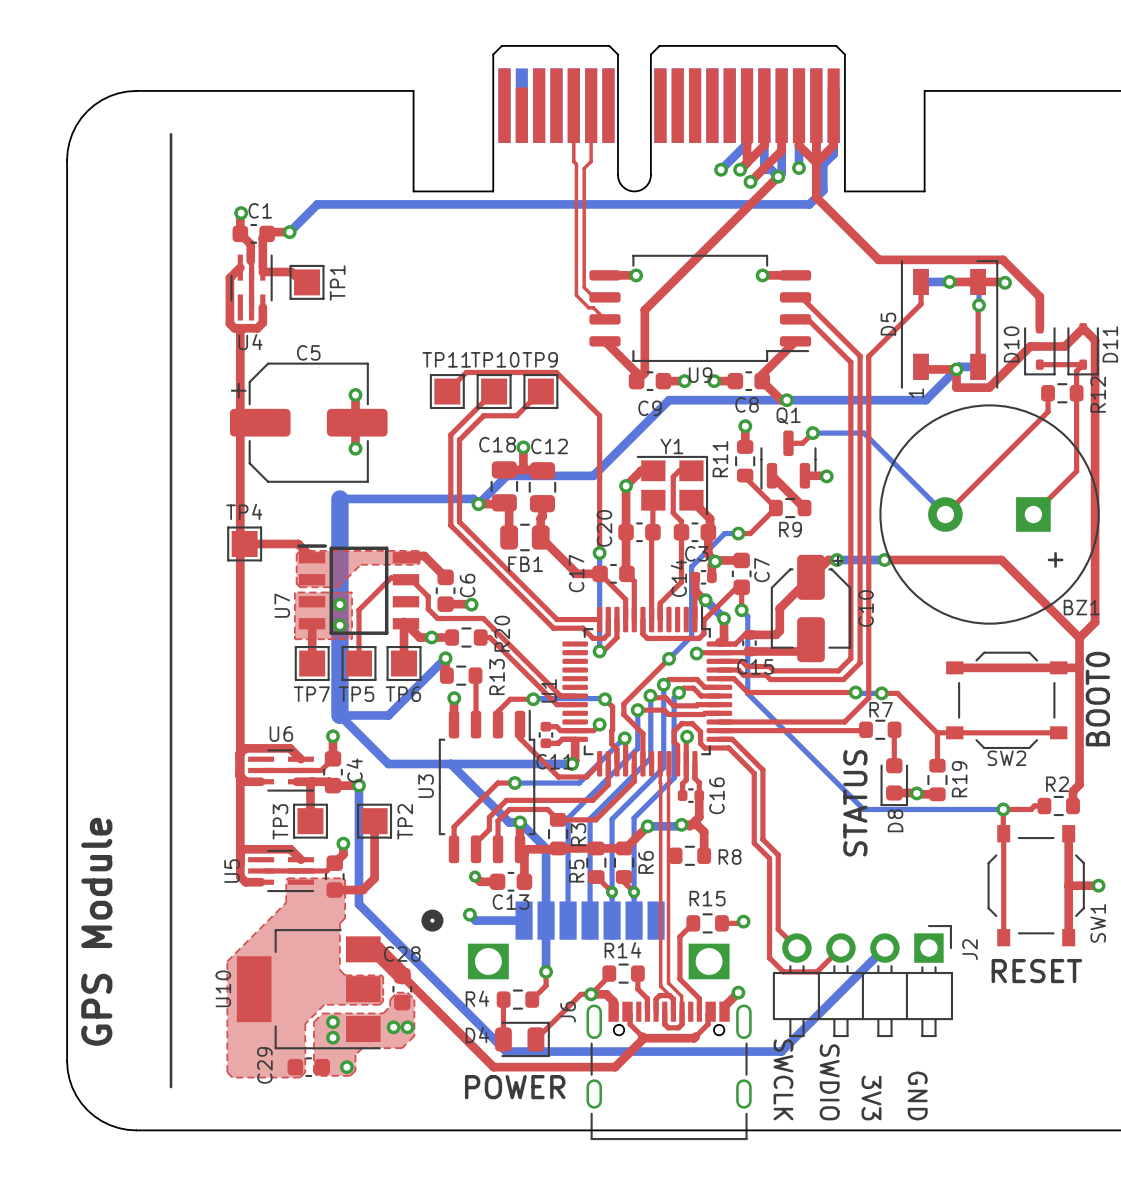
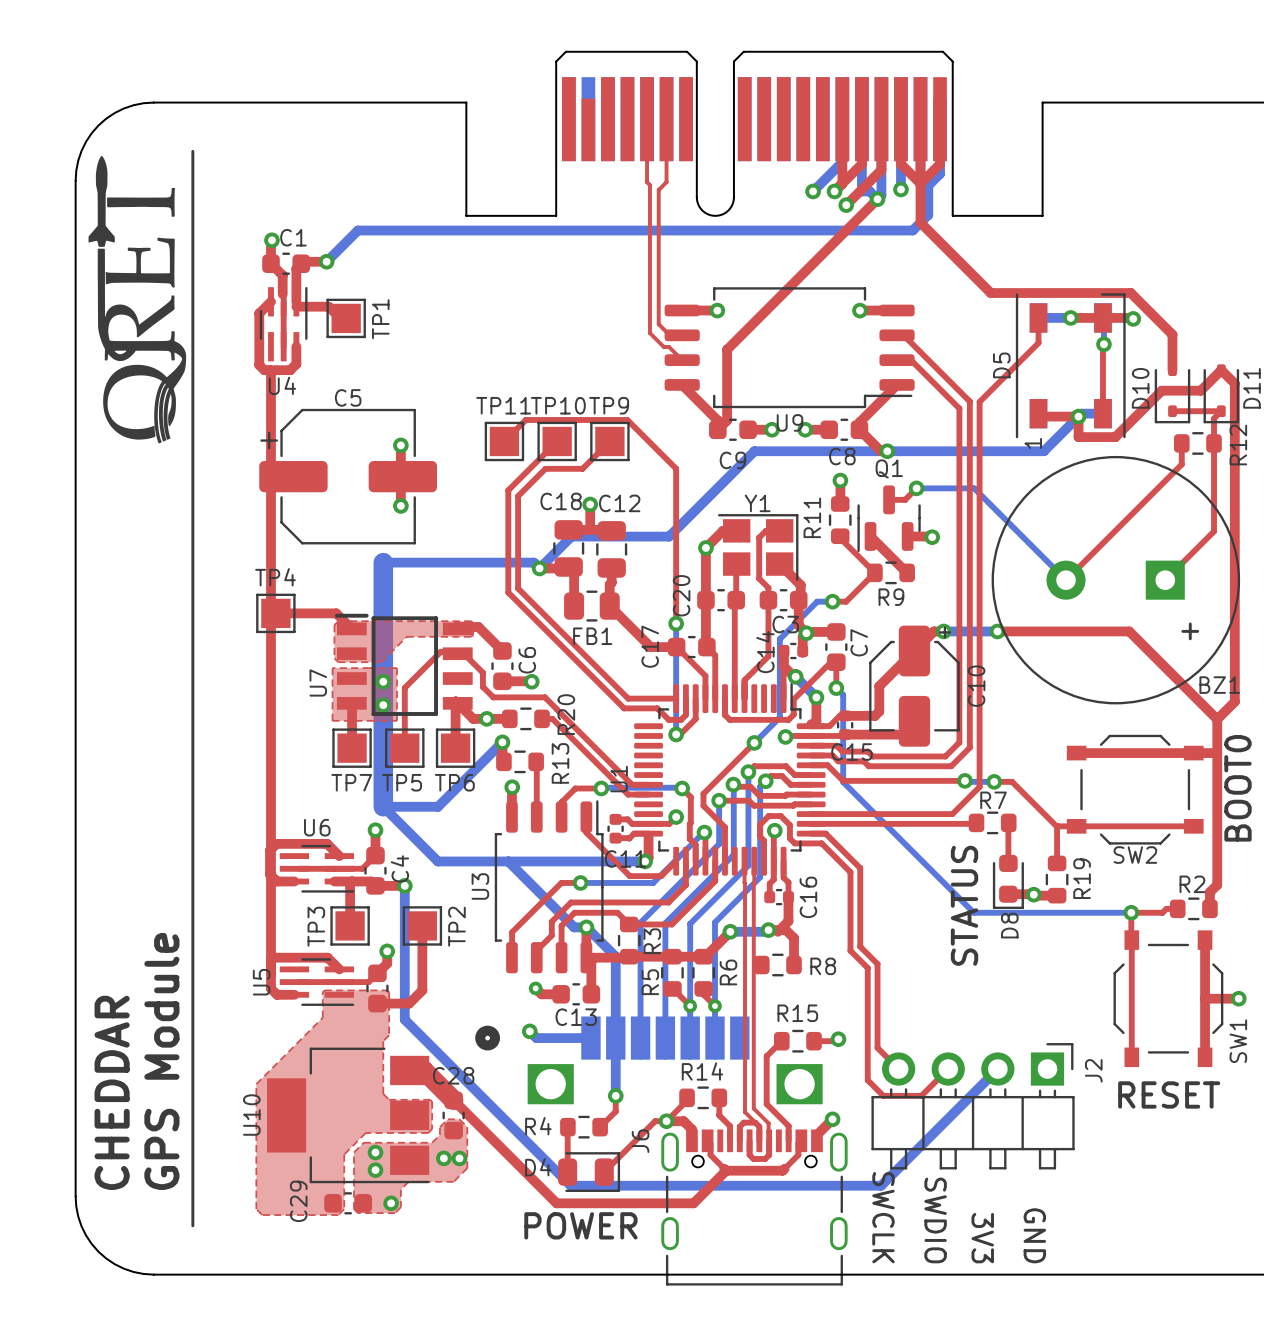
drawing: none -> [88, 155, 187, 444]
text: GPS Module (96, 931) -> CHEDDAR (112, 1092)
text: none -> GPS Module (161, 1061)

